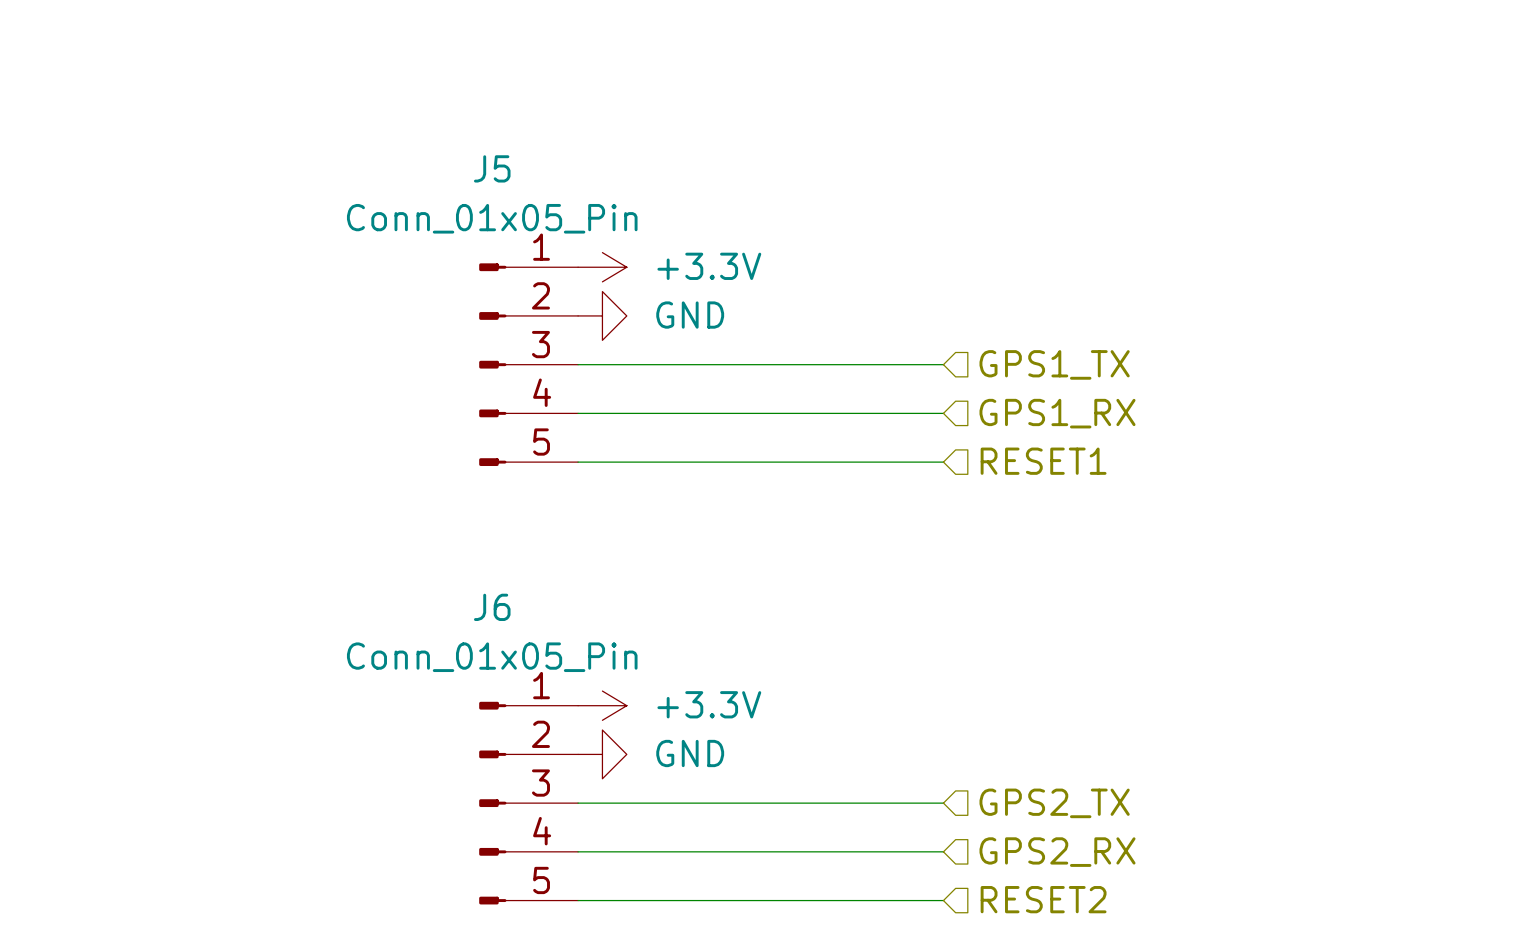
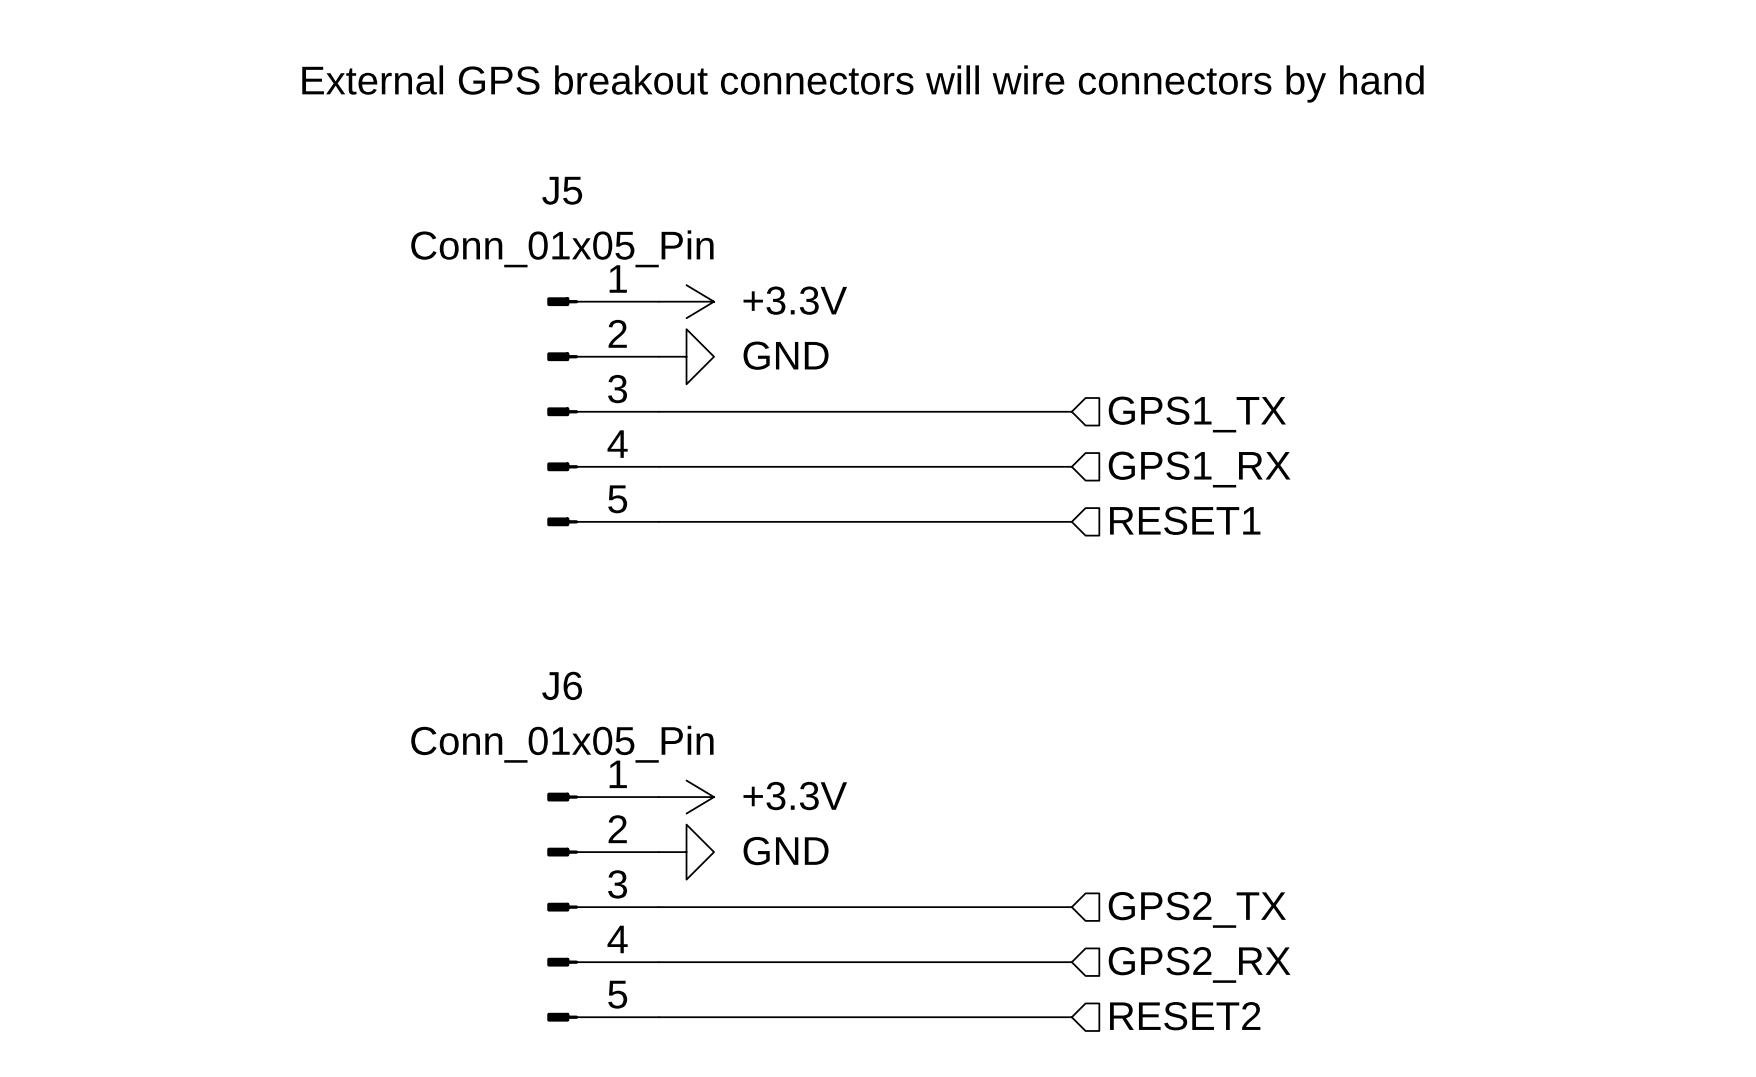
text: none -> External GPS breakout connectors will wire connectors by hand (863, 83)

